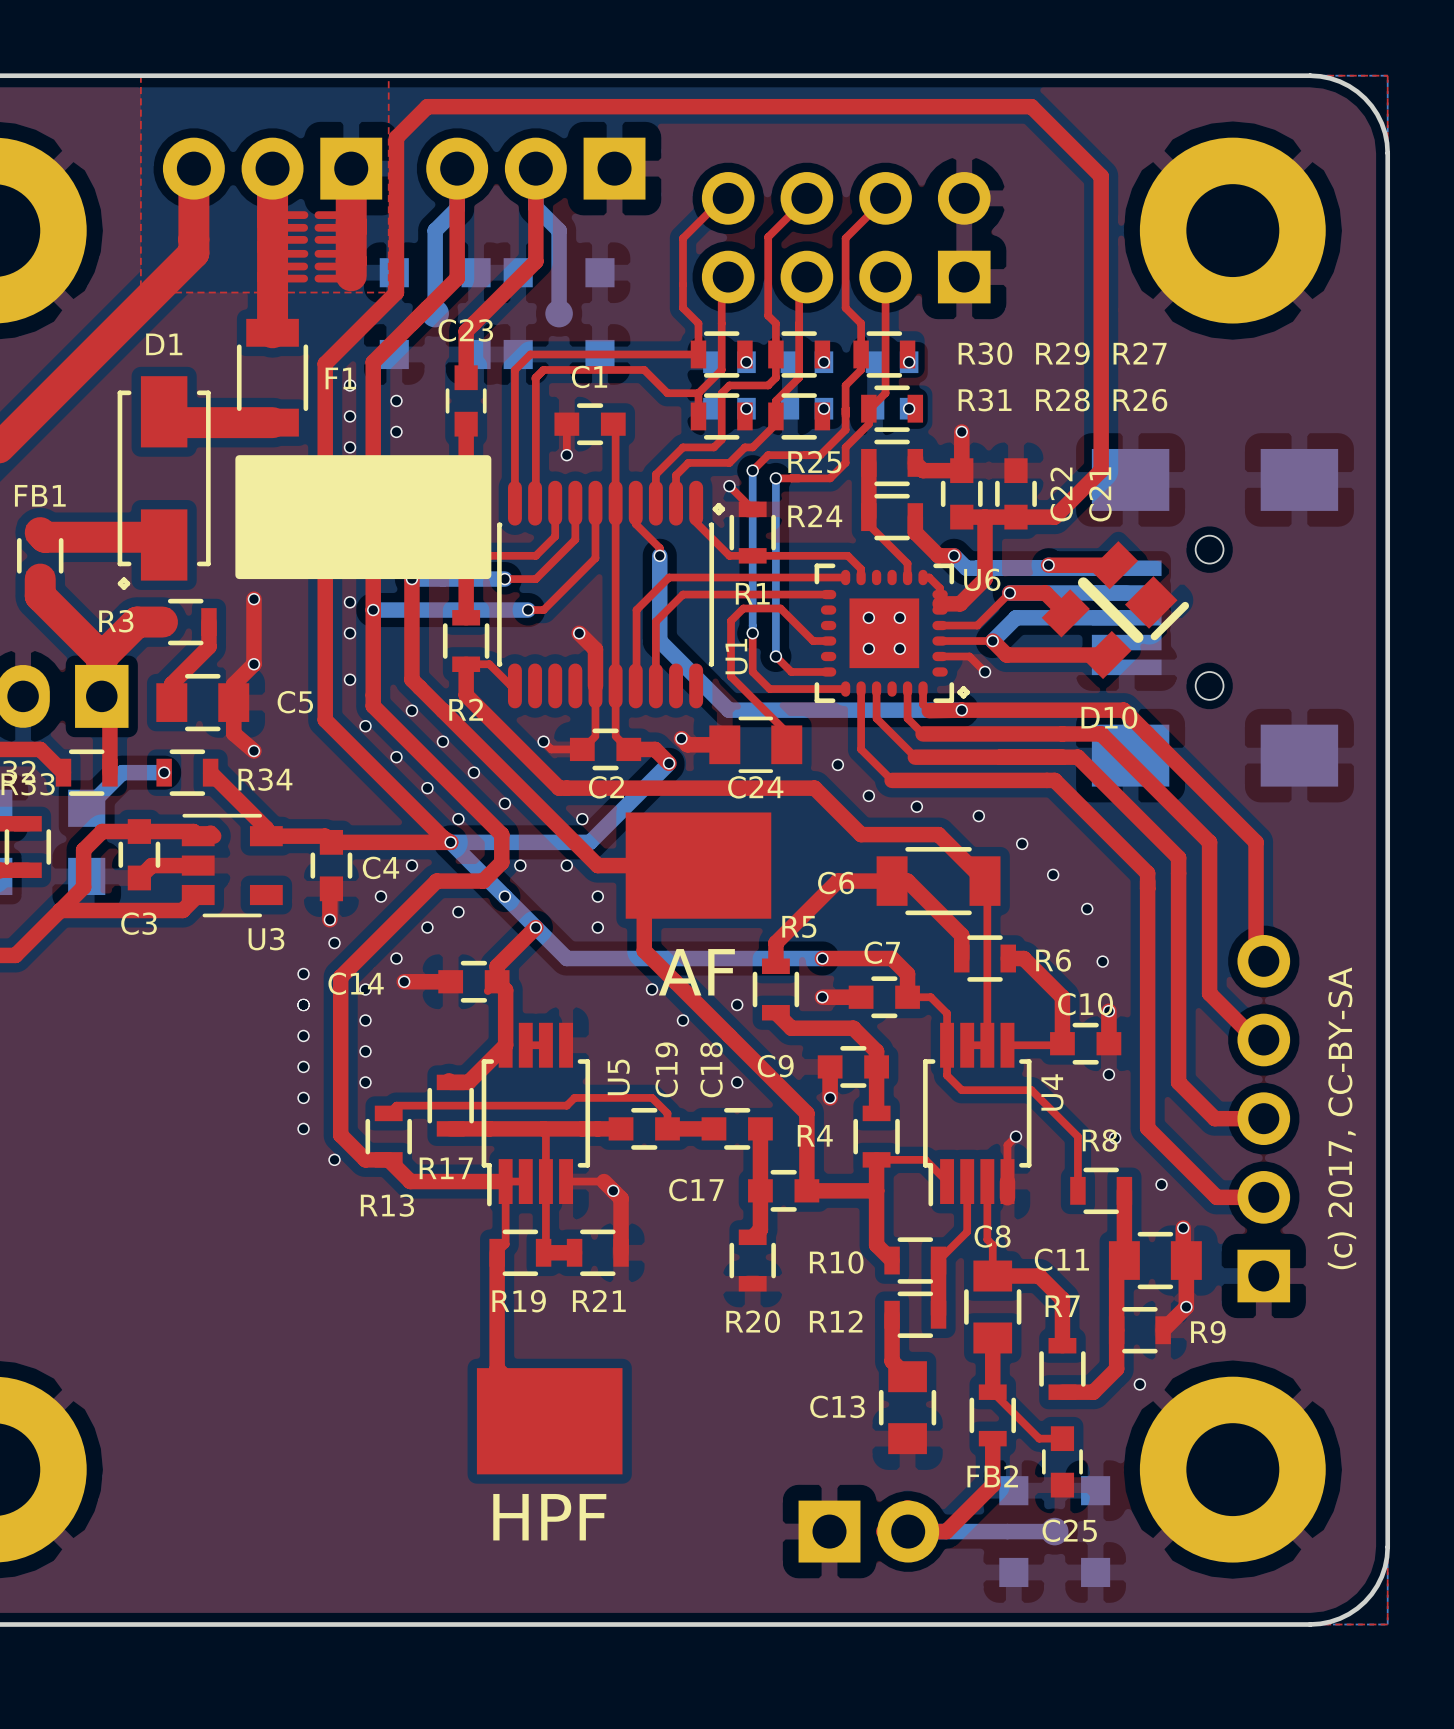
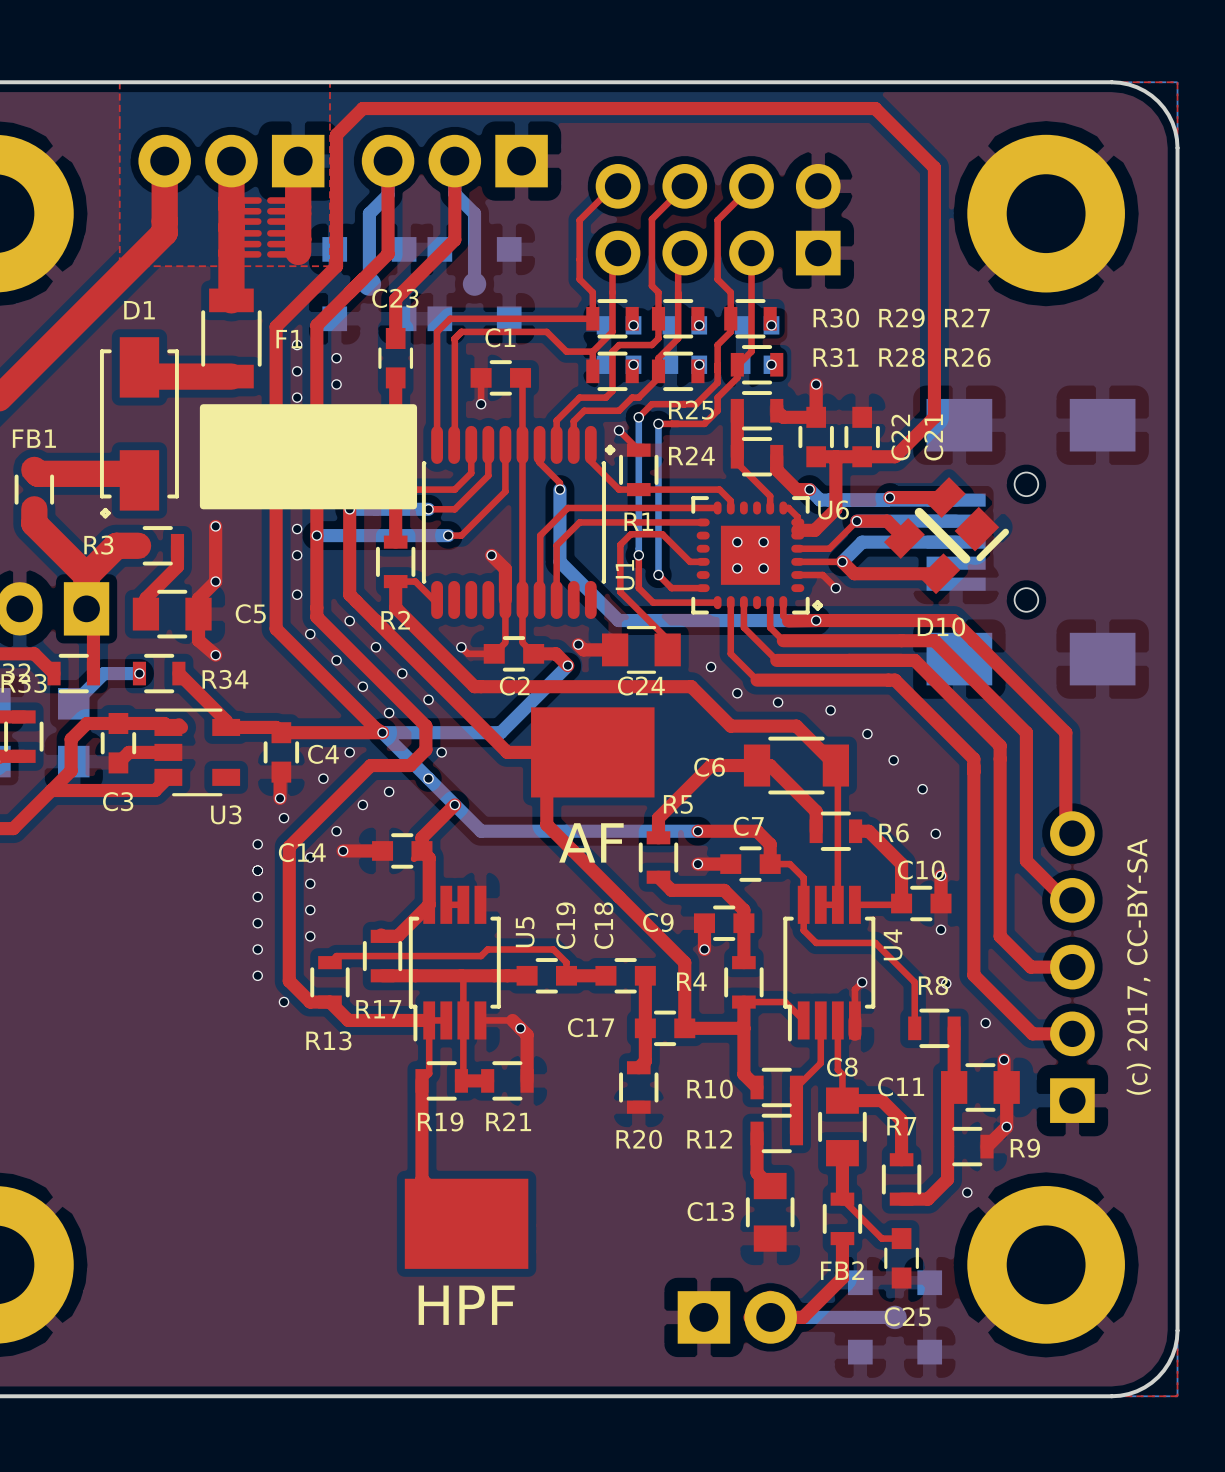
via: (582, 819) -> none
via: (566, 865) -> none
via: (597, 896) -> none
via: (597, 927) -> none
via: (652, 989) -> none
via: (737, 1004) -> none
via: (682, 1020) -> none
via: (737, 1082) -> none

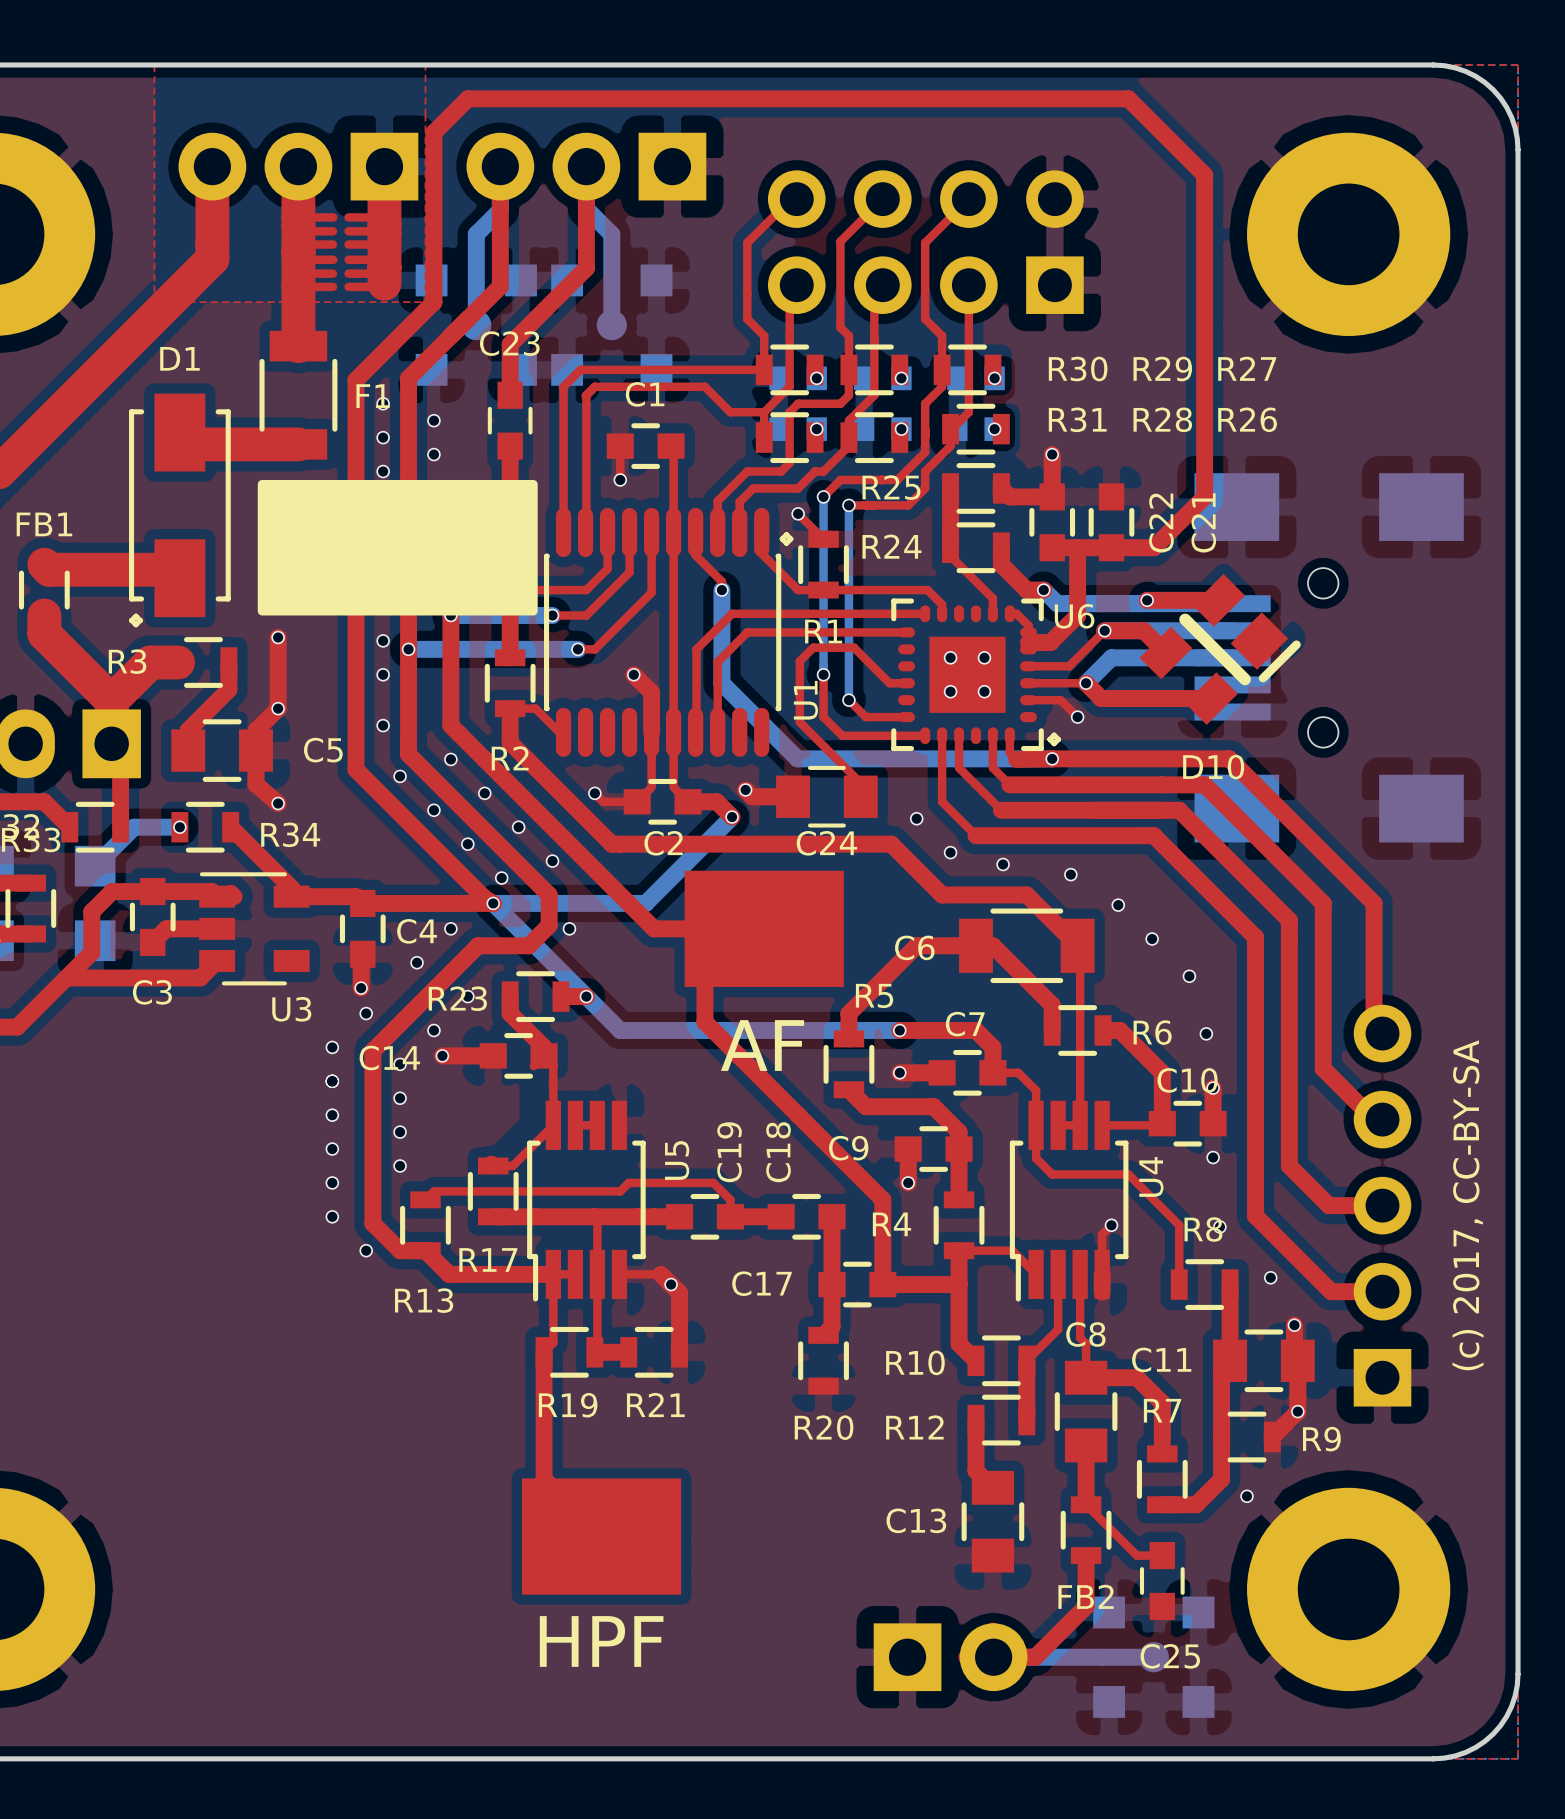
via: (428, 778) -> none
via: (389, 791) -> none
top track: none -> (510, 996) (510, 1013) (544, 1047)
R23: none -> (535, 996)
top track: (454, 804) (421, 837) (421, 844) -> (586, 996) (560, 996)
top track width: thick (421, 850) (429, 858) (429, 904) (397, 936) (382, 936) -> thin (544, 1055) (553, 1065) (553, 1125) (512, 1165) (493, 1165)

